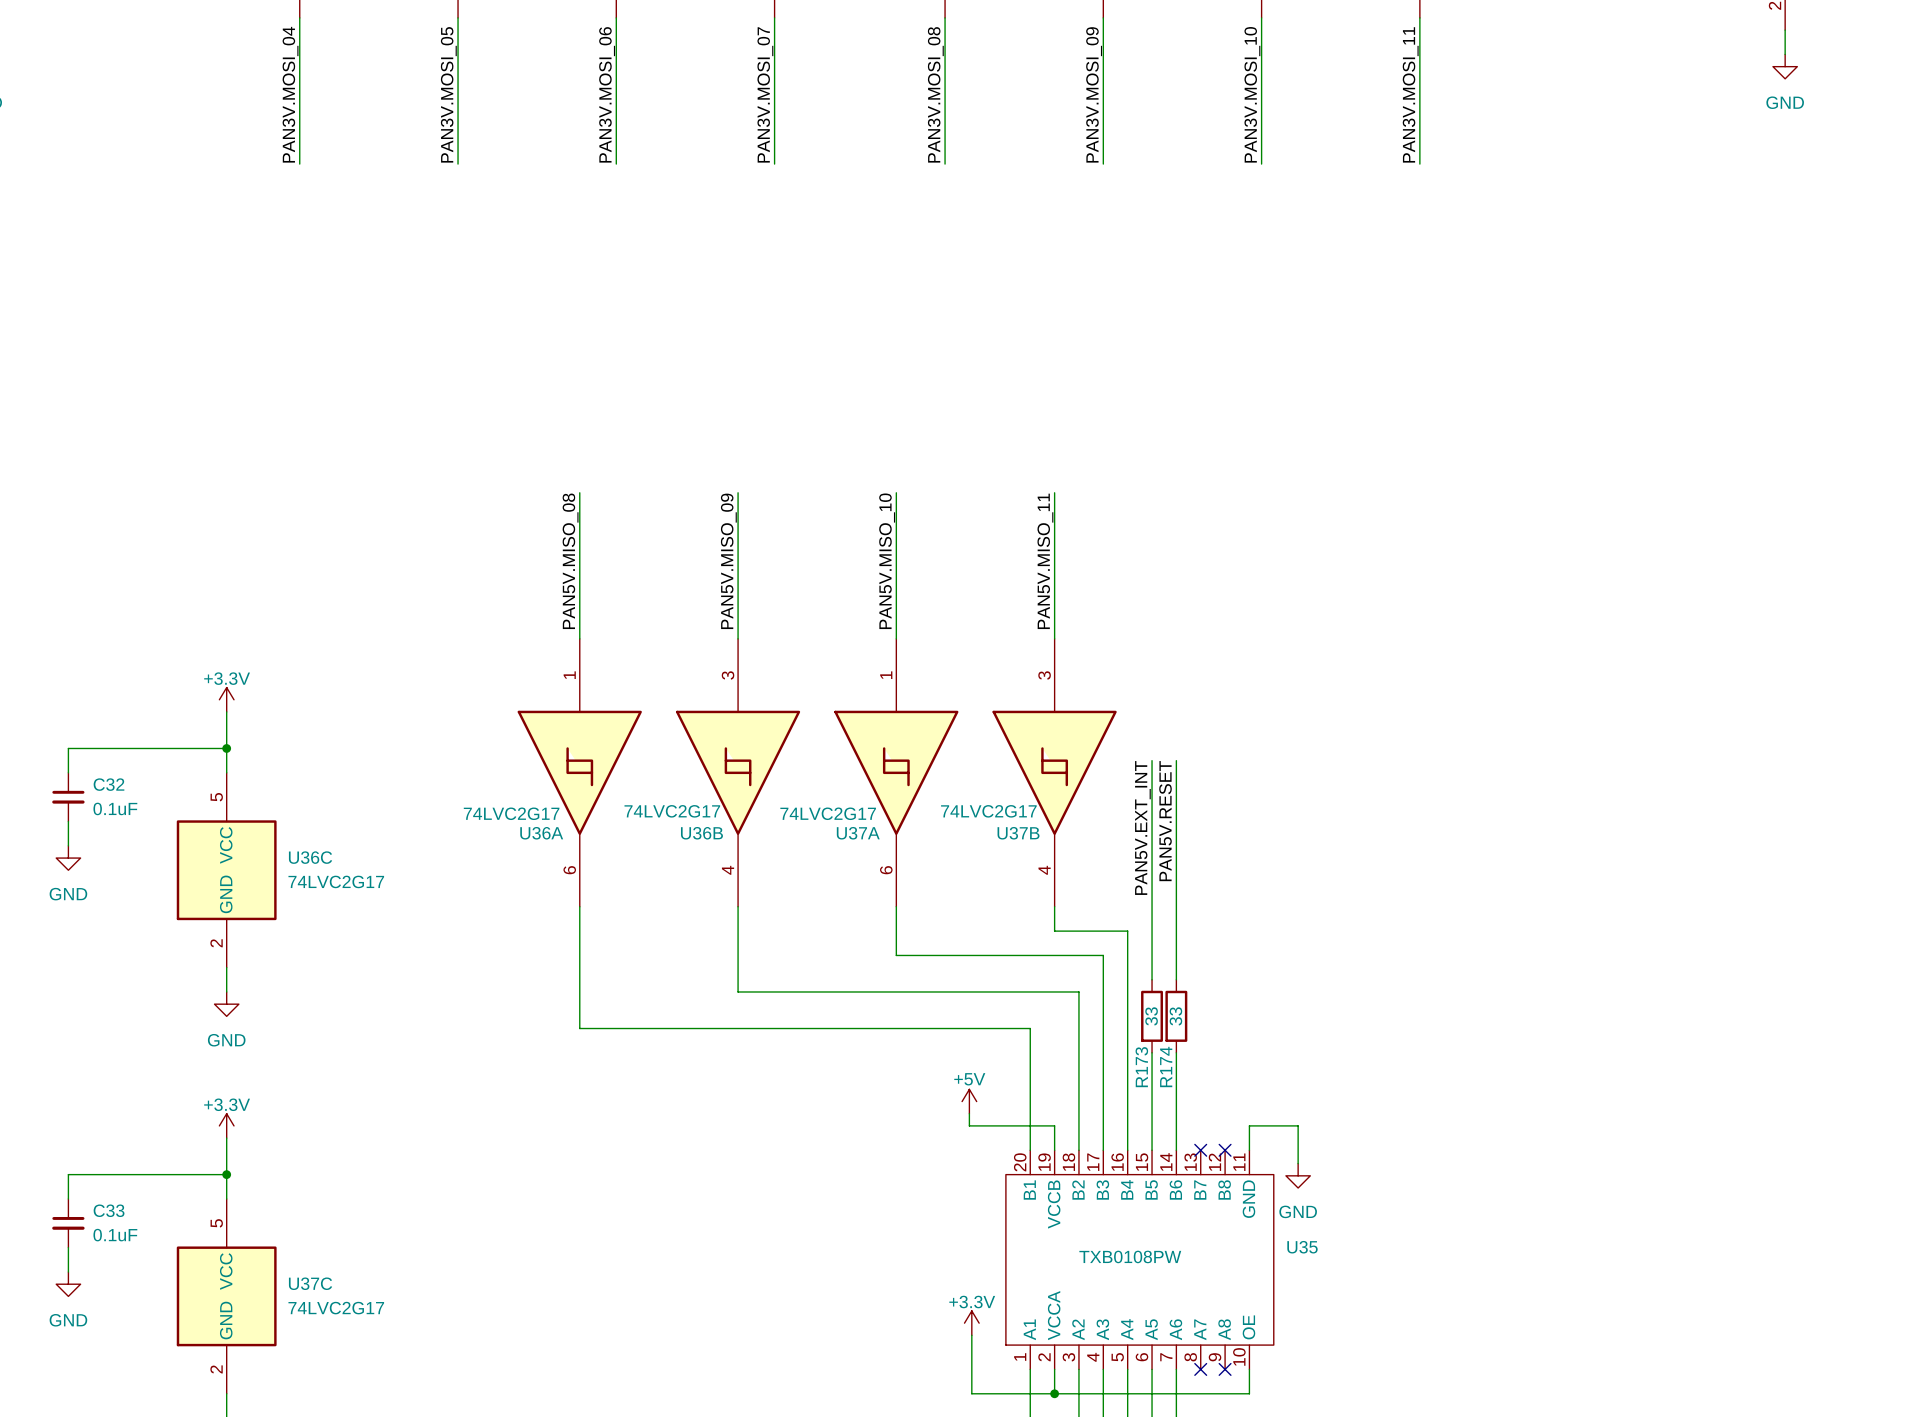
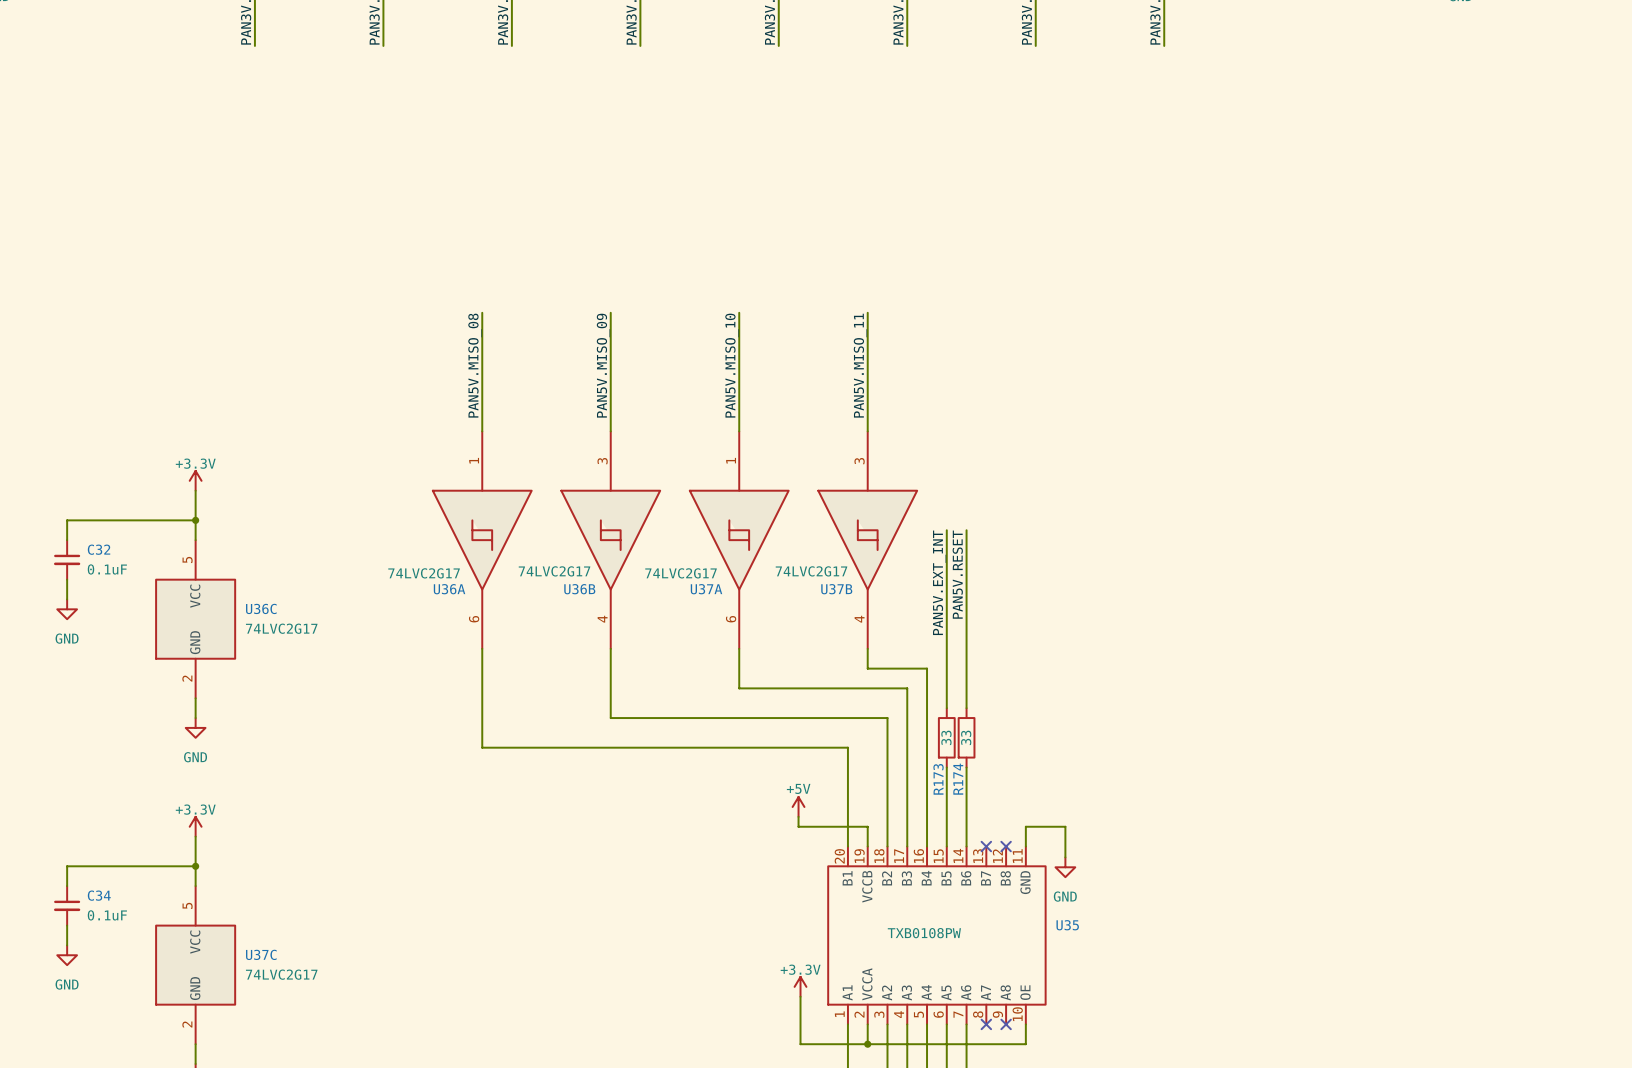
C33 name: C33 (109, 1210) -> C34 (99, 895)

